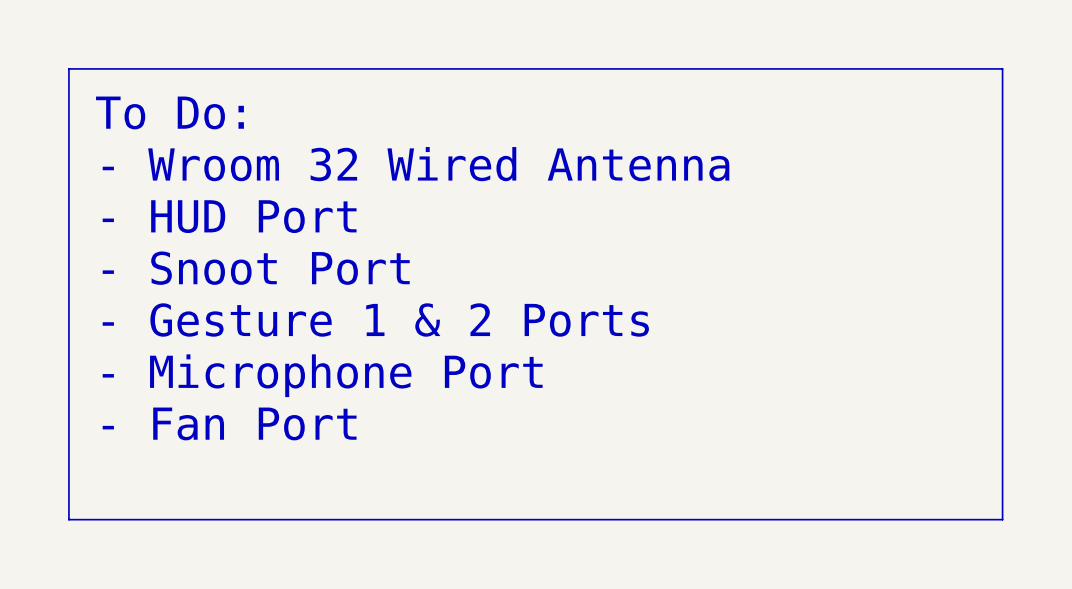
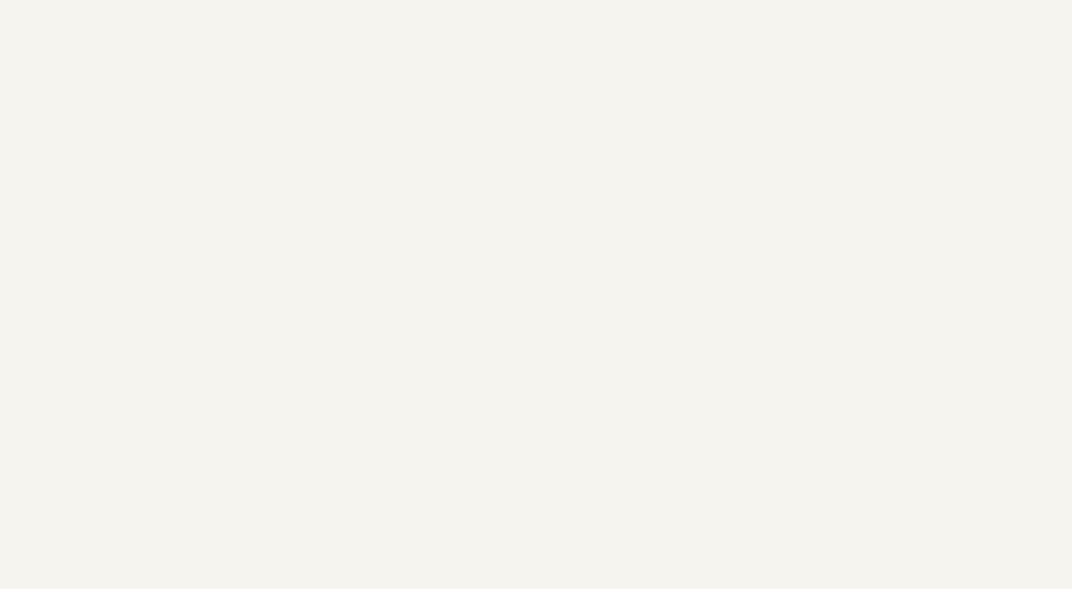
line: (68, 68) (1002, 68) (1002, 519) (68, 519) (68, 68) -> none
text: To Do: (169, 112) -> none
text: - Wroom 32 Wired Antenna (416, 164) -> none
text: - HUD Port (229, 216) -> none
text: - Snoot Port (256, 268) -> none
text: - Gesture 1 & 2 Ports (375, 320) -> none
text: - Microphone Port (322, 375) -> none
text: - Fan Port (229, 423) -> none

